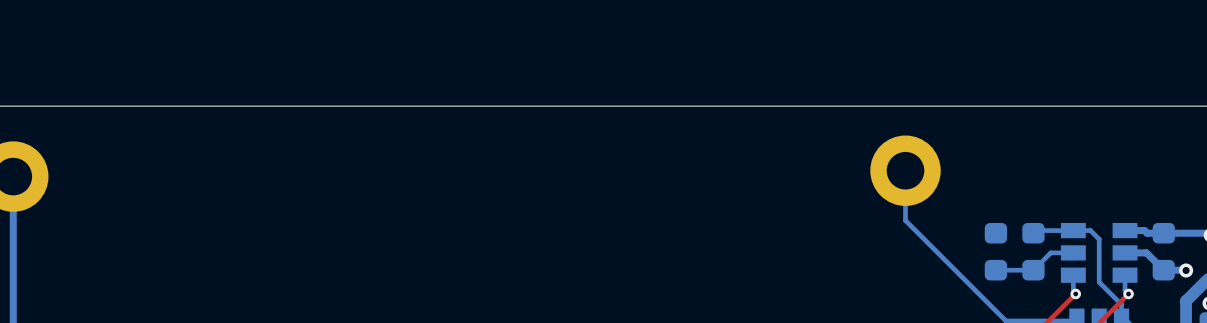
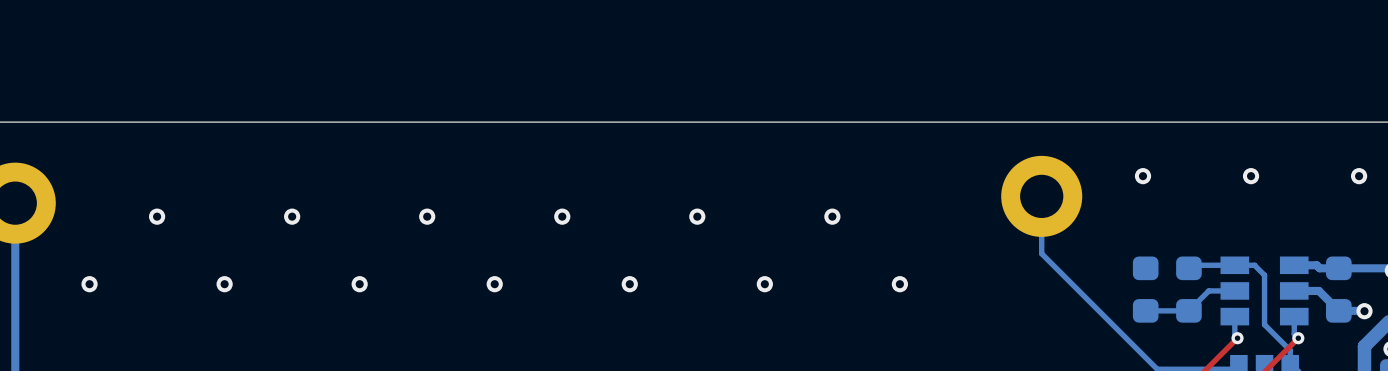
via: none -> (1143, 176)
via: none -> (1251, 176)
via: none -> (1359, 176)
via: none -> (157, 216)
via: none -> (292, 216)
via: none -> (427, 216)
via: none -> (562, 216)
via: none -> (697, 216)
via: none -> (832, 216)
via: none -> (89, 284)
via: none -> (224, 284)
via: none -> (359, 284)
via: none -> (494, 284)
via: none -> (629, 284)
via: none -> (764, 284)
via: none -> (899, 284)

